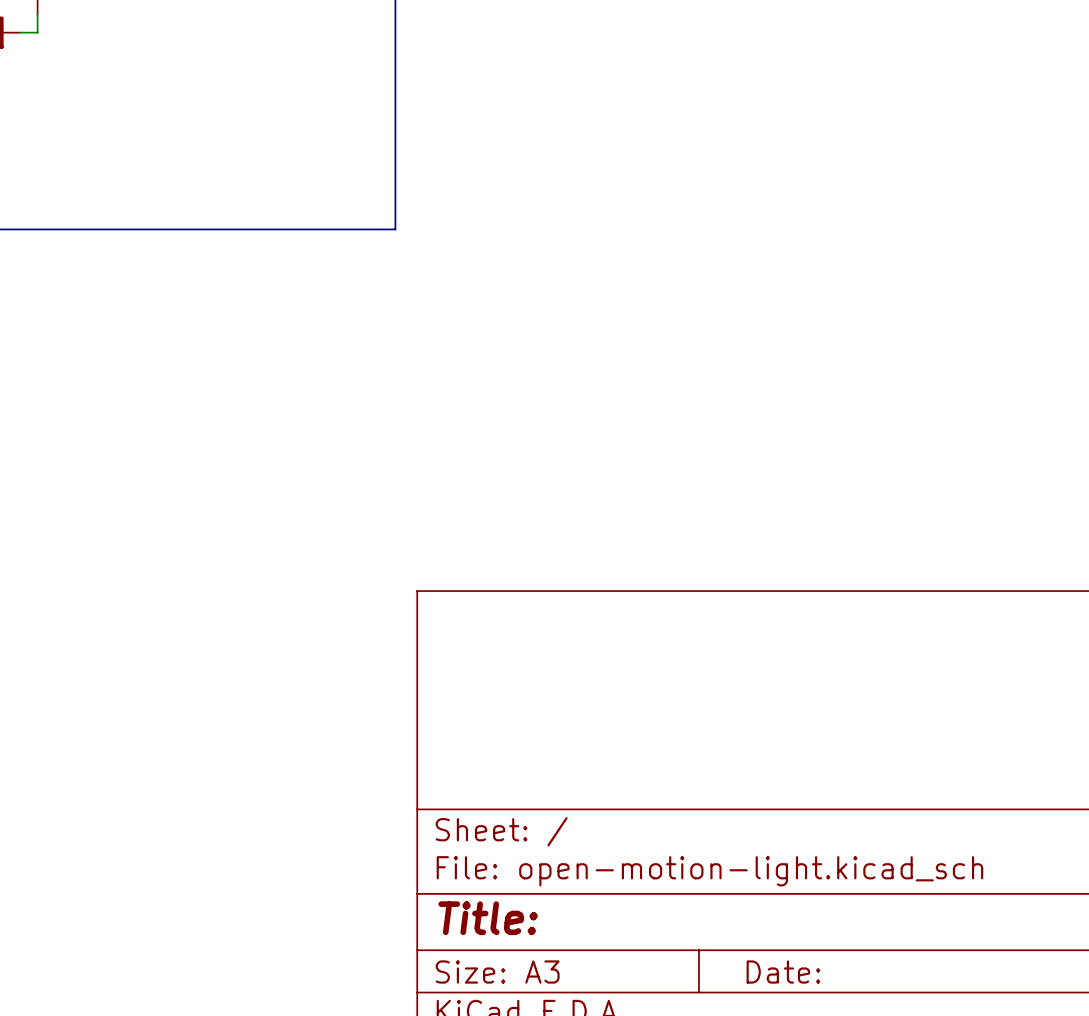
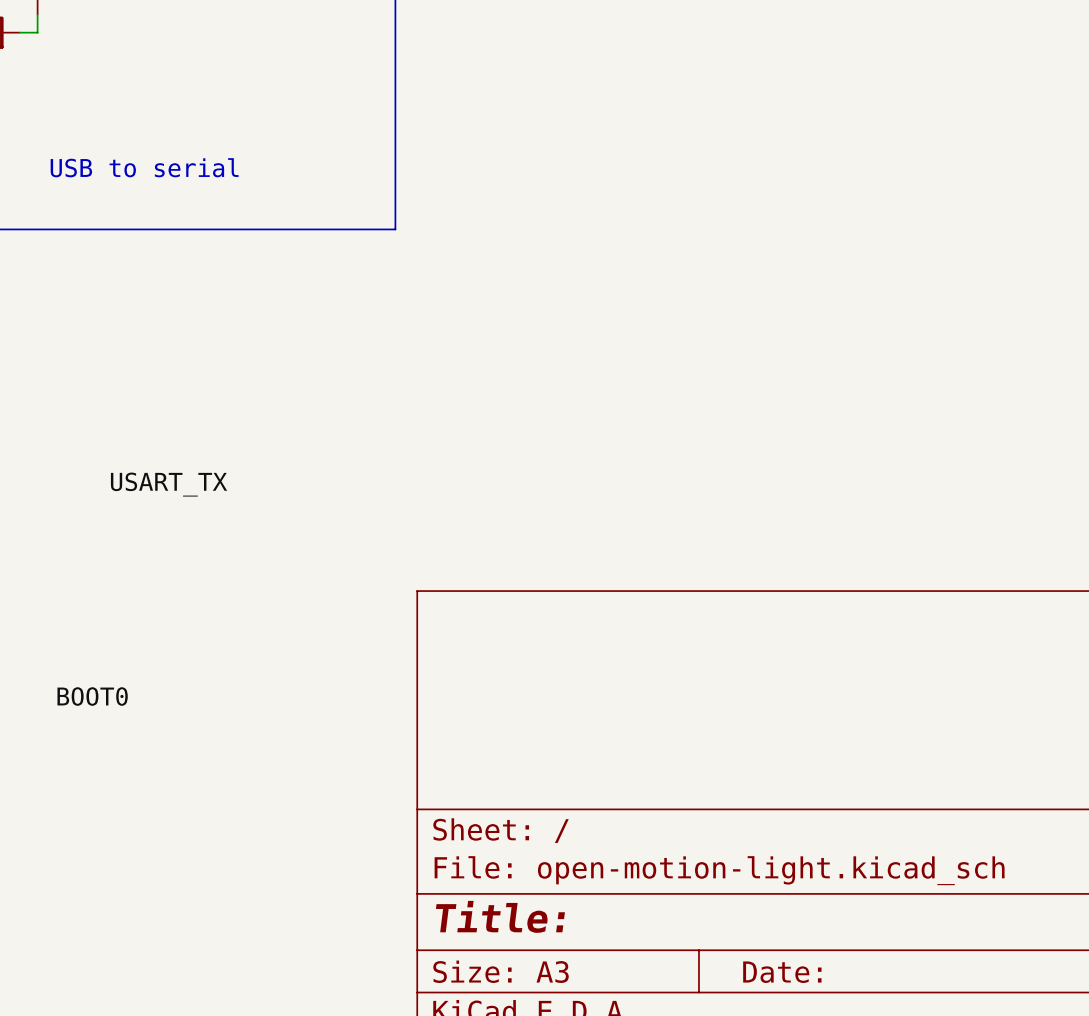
text: none -> USB to serial (144, 167)
label: none -> USART_TX (169, 484)
label: none -> BOOT0 (92, 696)

